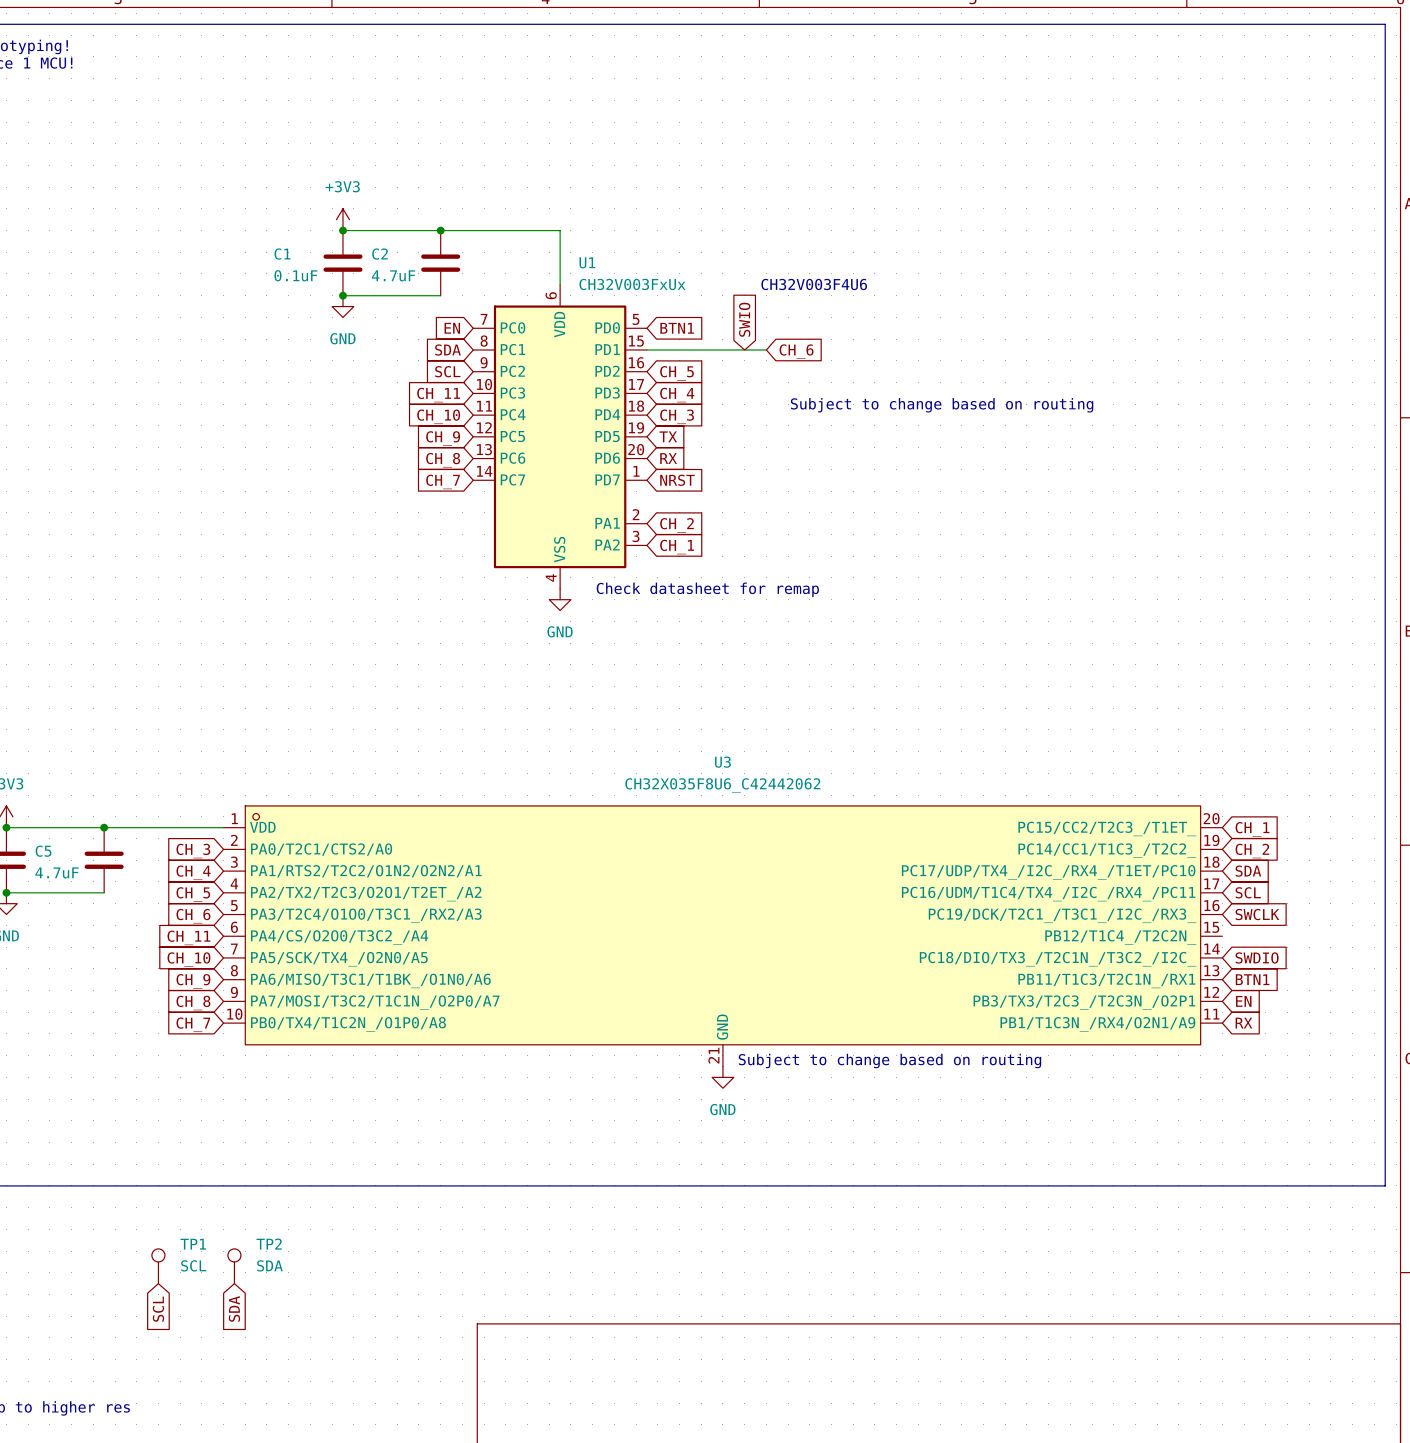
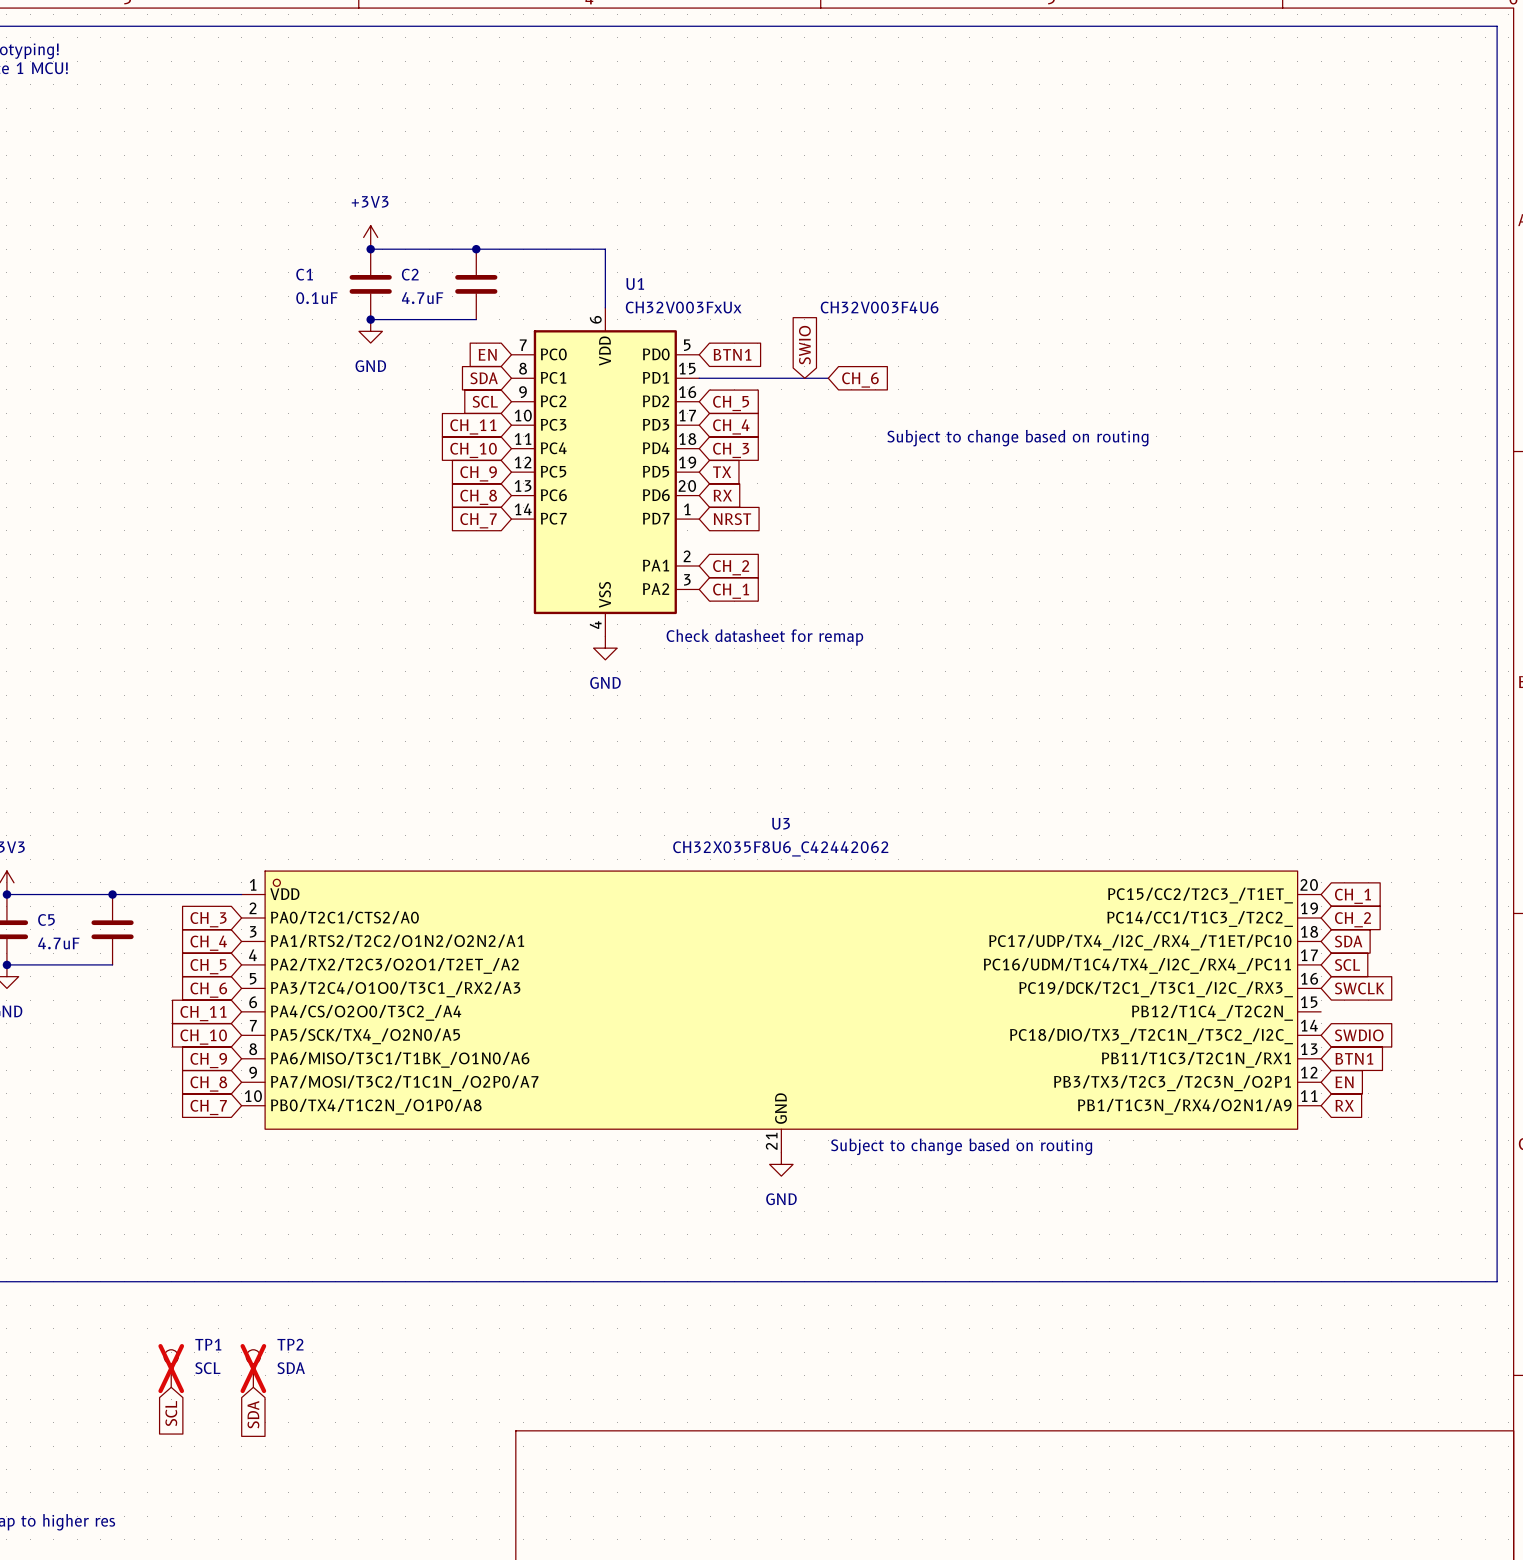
TP1 do-not-place cross: none -> (171, 1368)
TP2 do-not-place cross: none -> (253, 1368)

